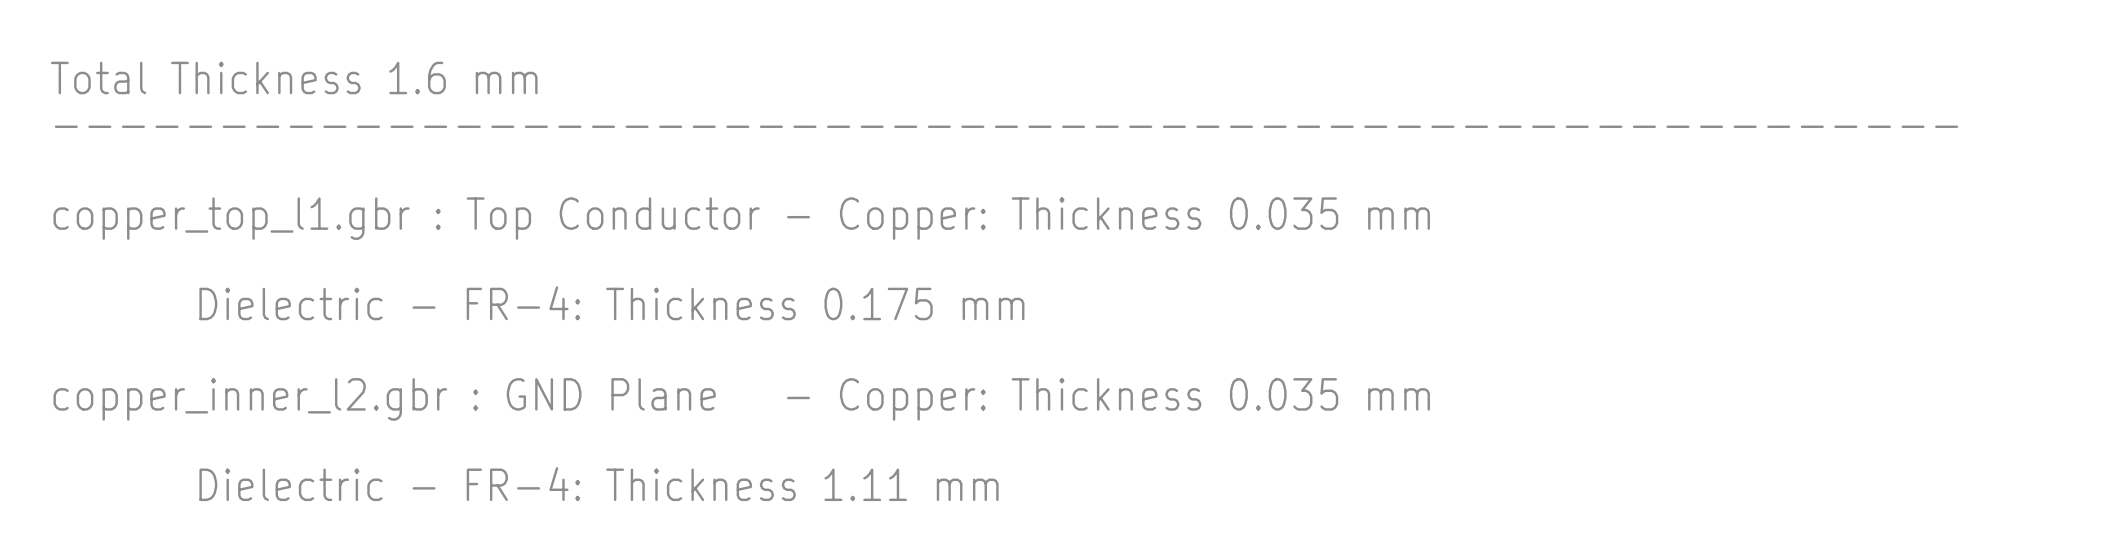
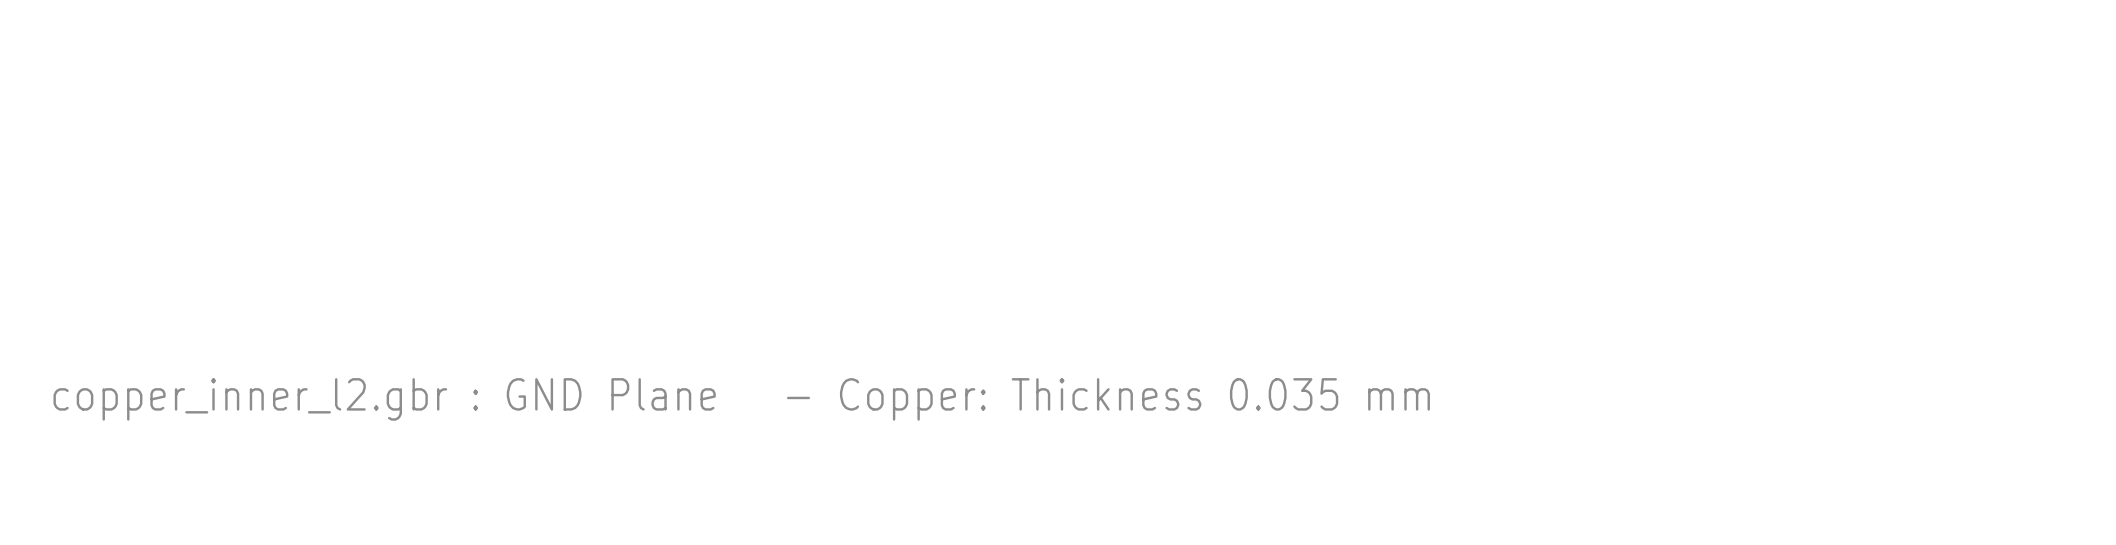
text: Total Thickness 1.6 mm (294, 77) -> none
text: --------------------------------------------------------- (1006, 126) -> none
text: copper_top_l1.gbr : Top Conductor - Copper: Thickness 0.035 mm (741, 218) -> none
text: Dielectric - FR-4: Thickness 0.175 mm (611, 303) -> none
text: Dielectric - FR-4: Thickness 1.11 mm (599, 484) -> none

